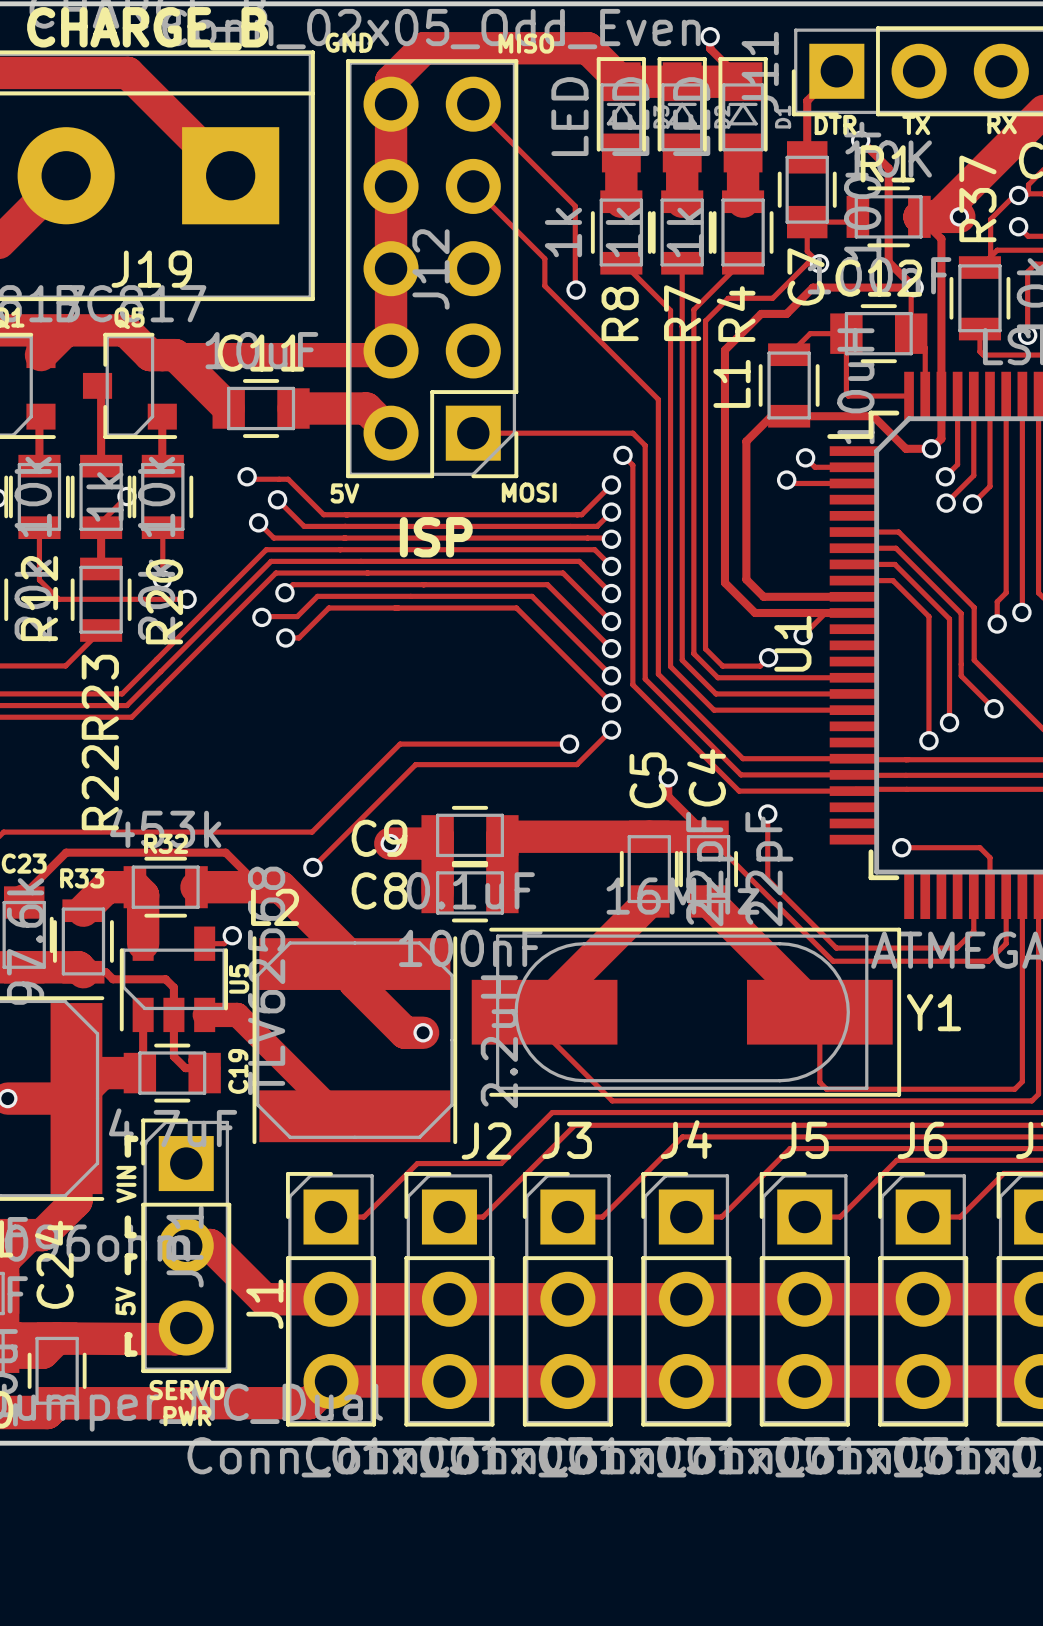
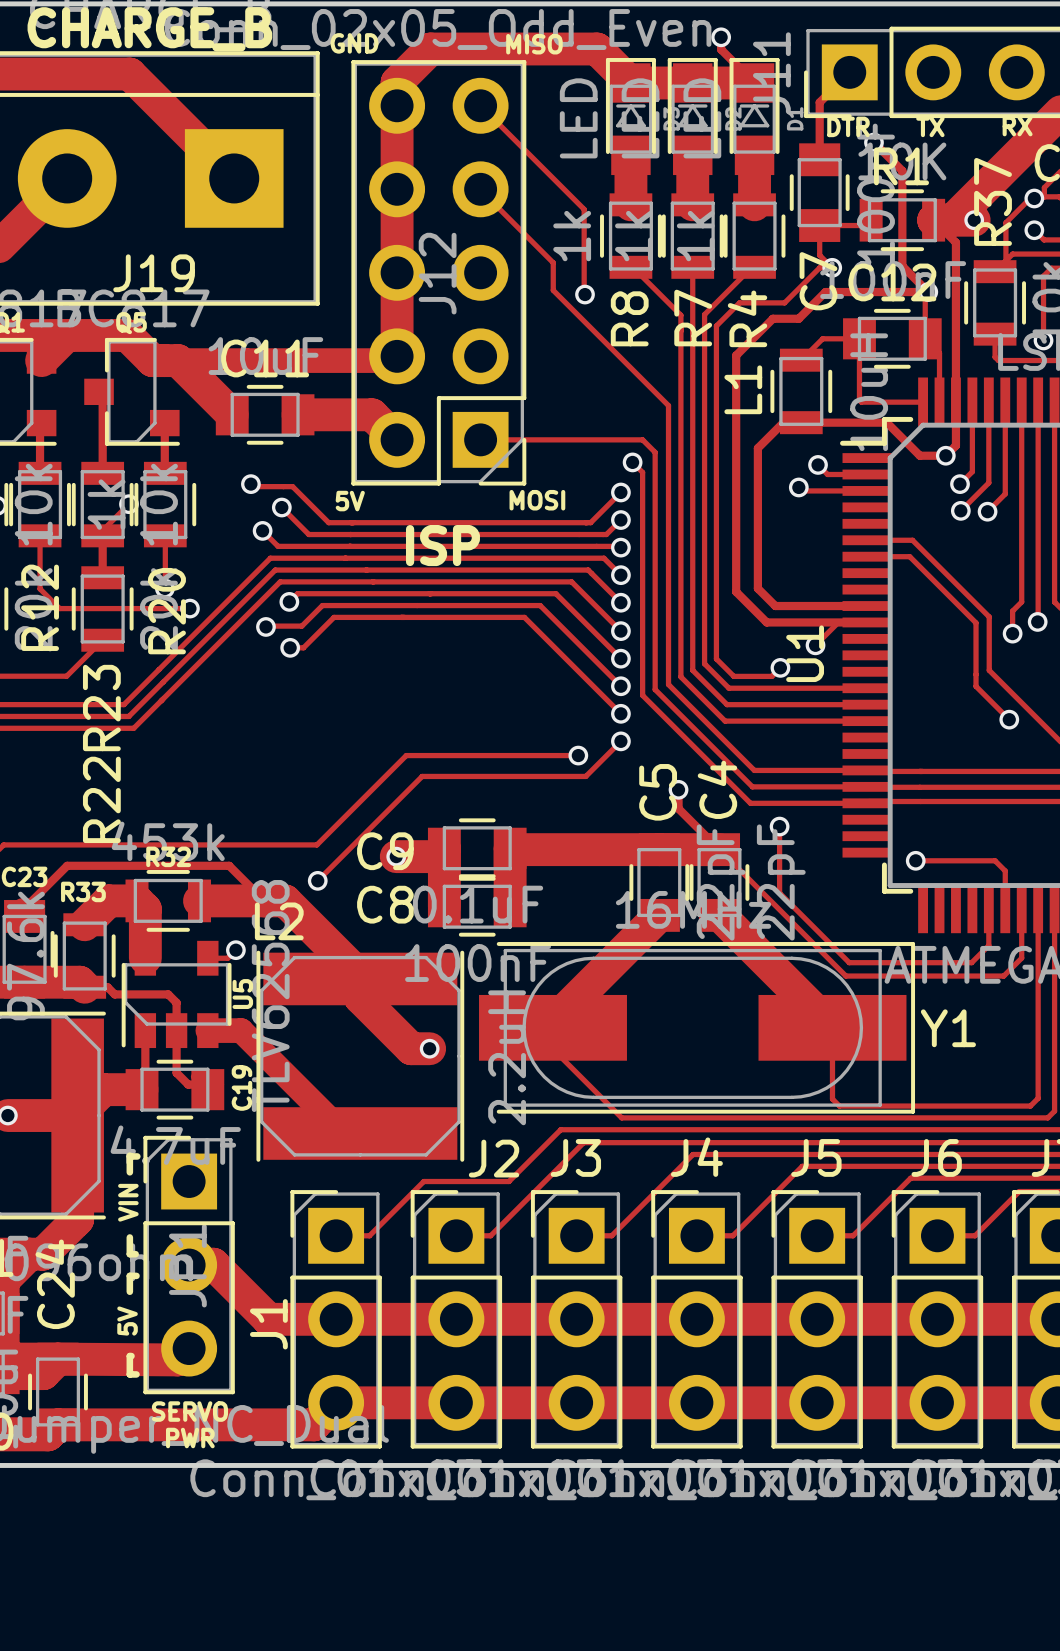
track: (853, 564) (894, 564) (949, 619) (949, 722) -> none
track: (853, 580) (892, 580) (928, 616) (928, 740) -> none
via: (949, 722) -> none
via: (928, 740) -> none

